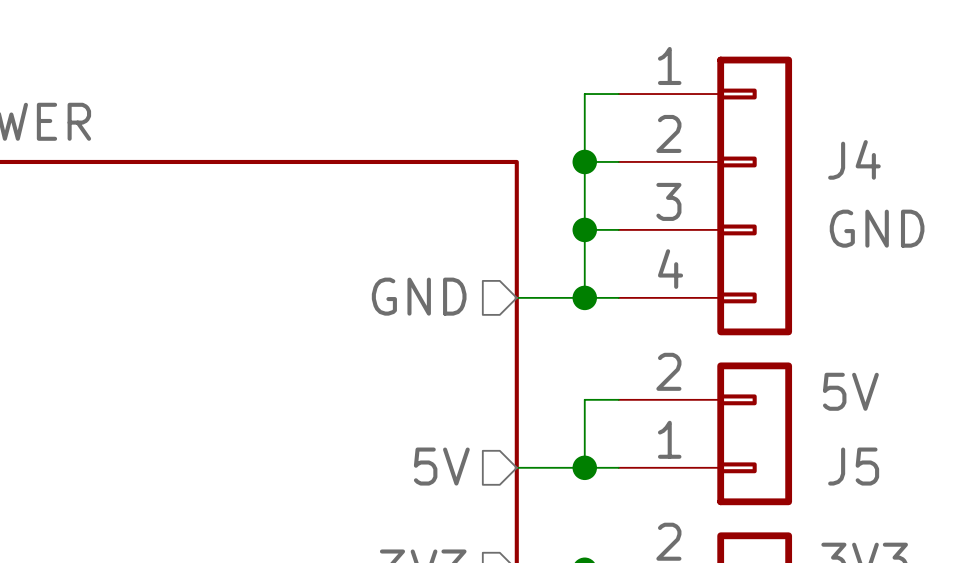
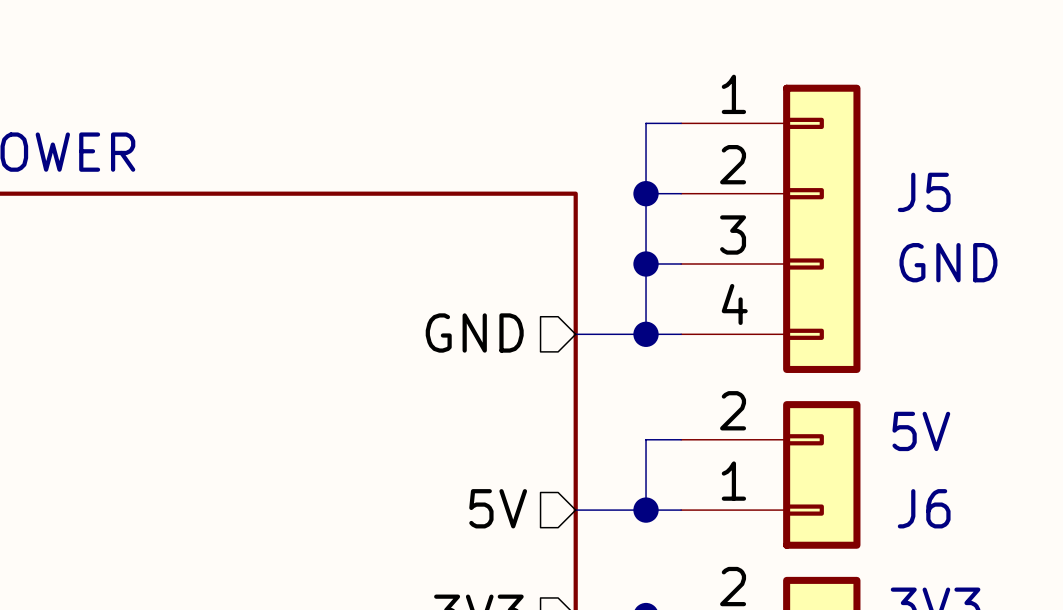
J4 name: J4 (854, 159) -> J5 (924, 192)
J5 name: J5 (853, 466) -> J6 (924, 508)

